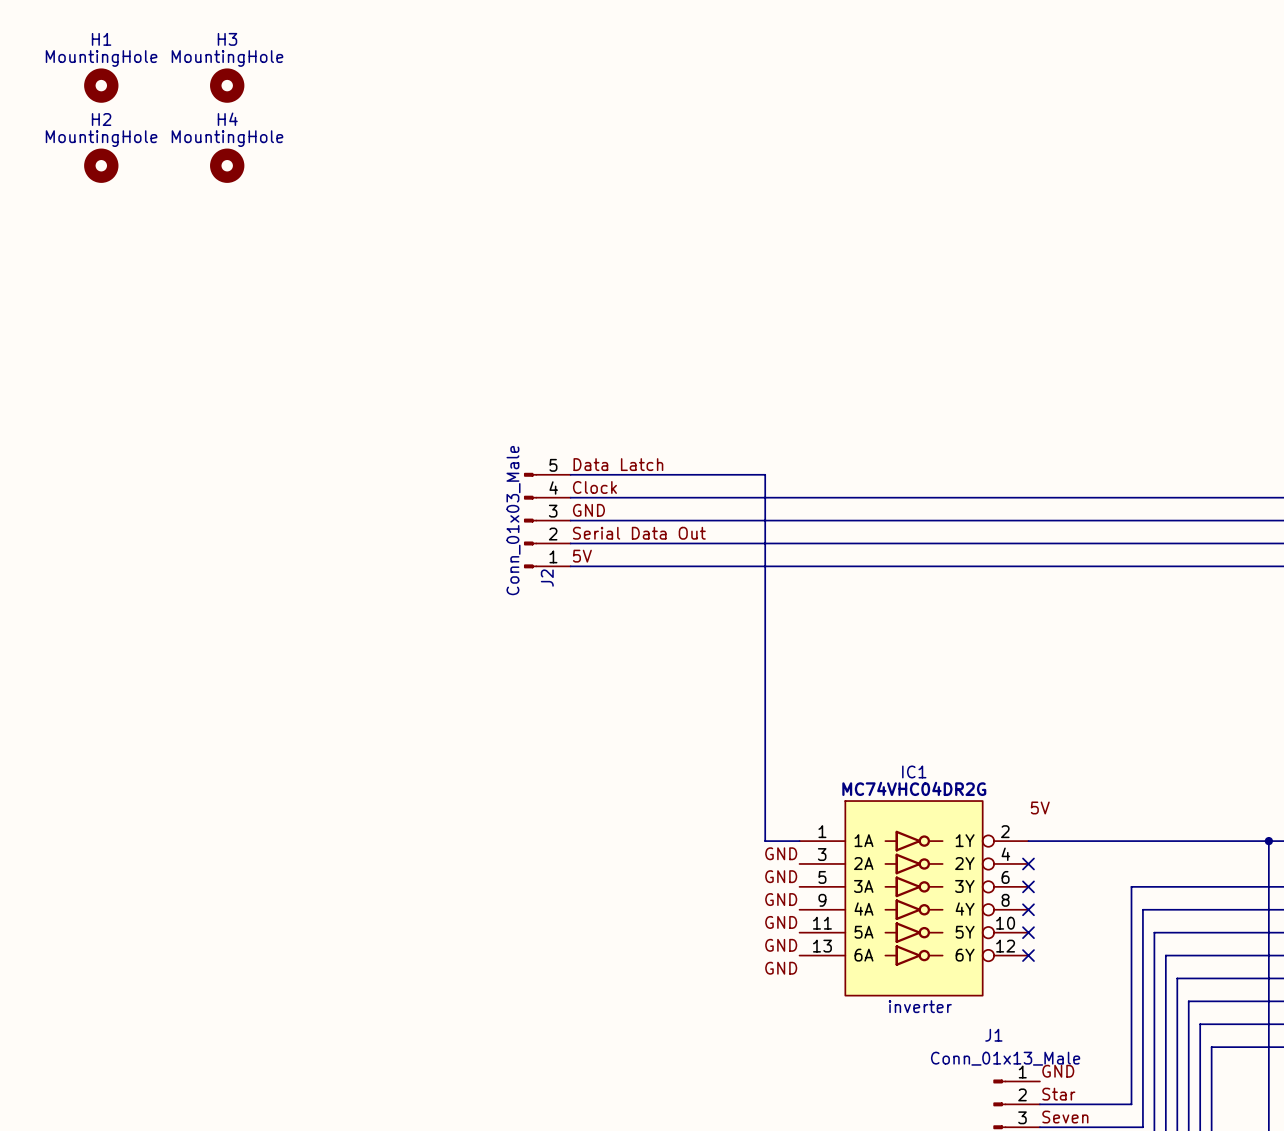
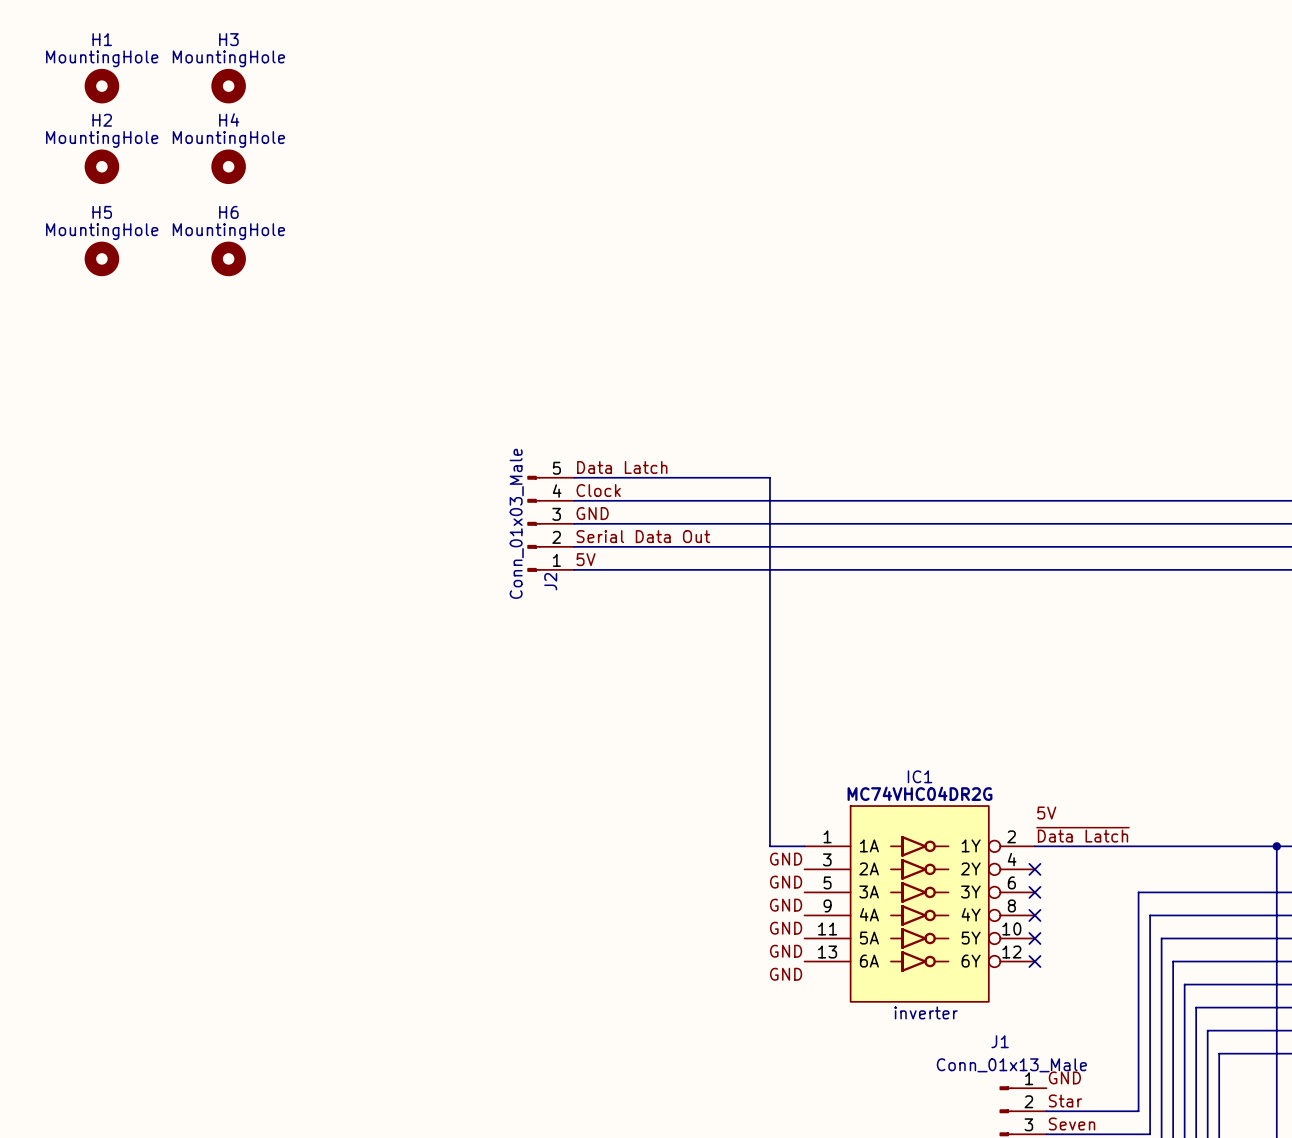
H5: none -> MountingHole (101, 258)
H6: none -> MountingHole (228, 258)
label: none -> ~{Data Latch} (1082, 834)

